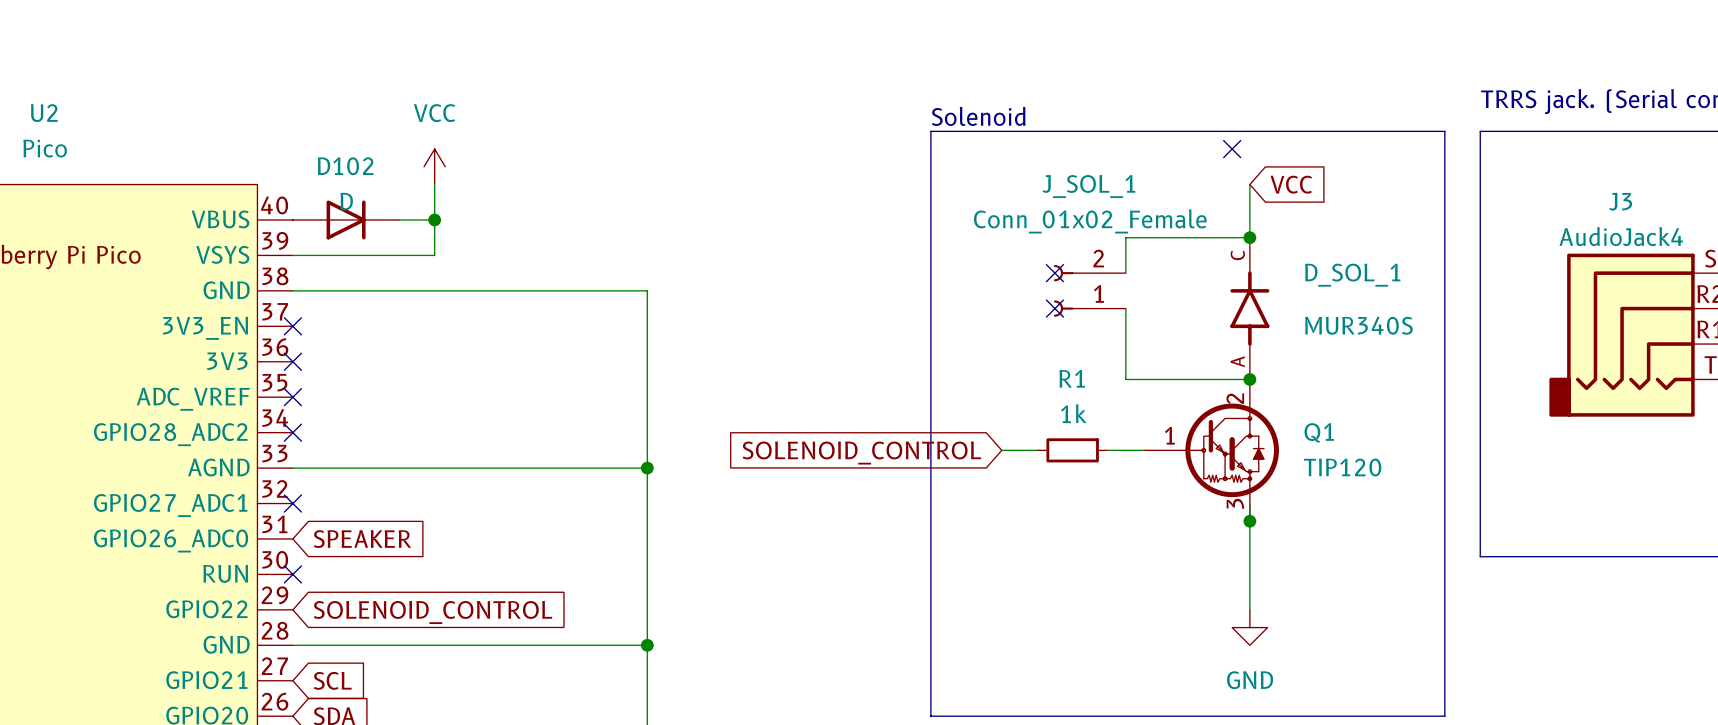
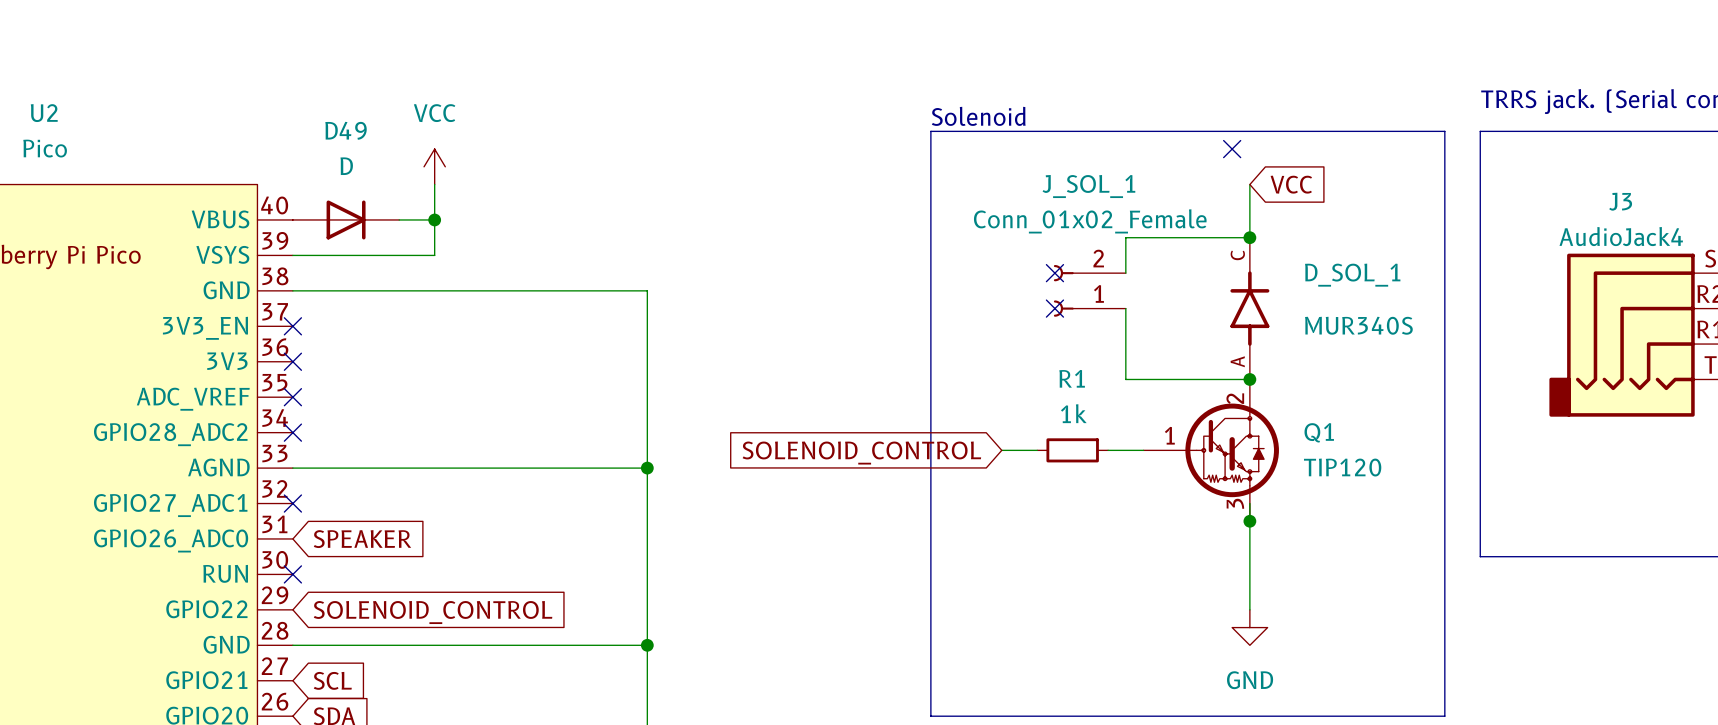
D102 name: D102 (345, 166) -> D49 (346, 130)
D102 value position: D (346, 201) -> D (346, 166)

